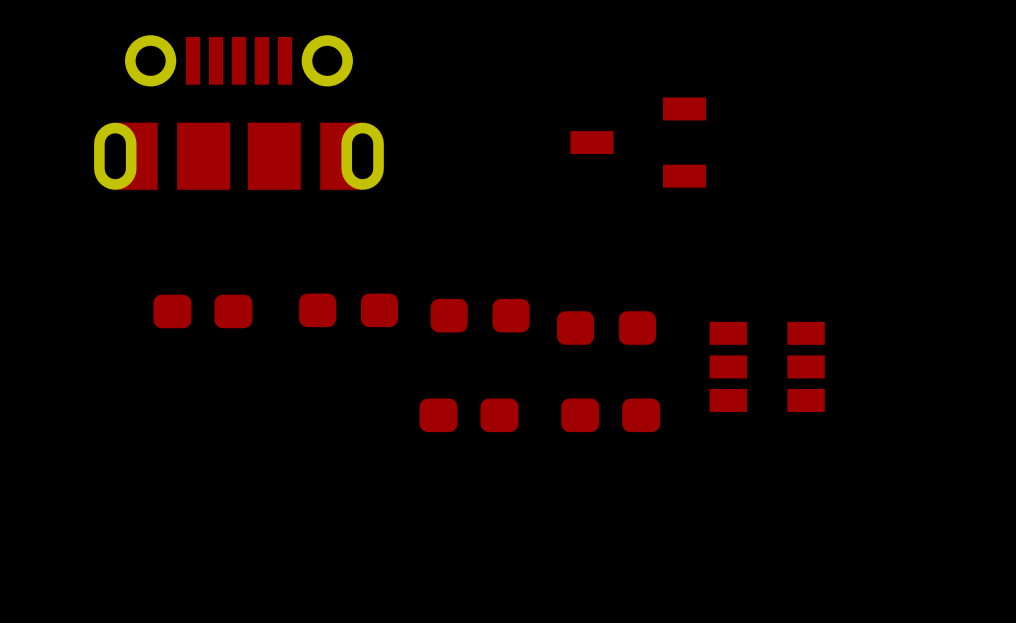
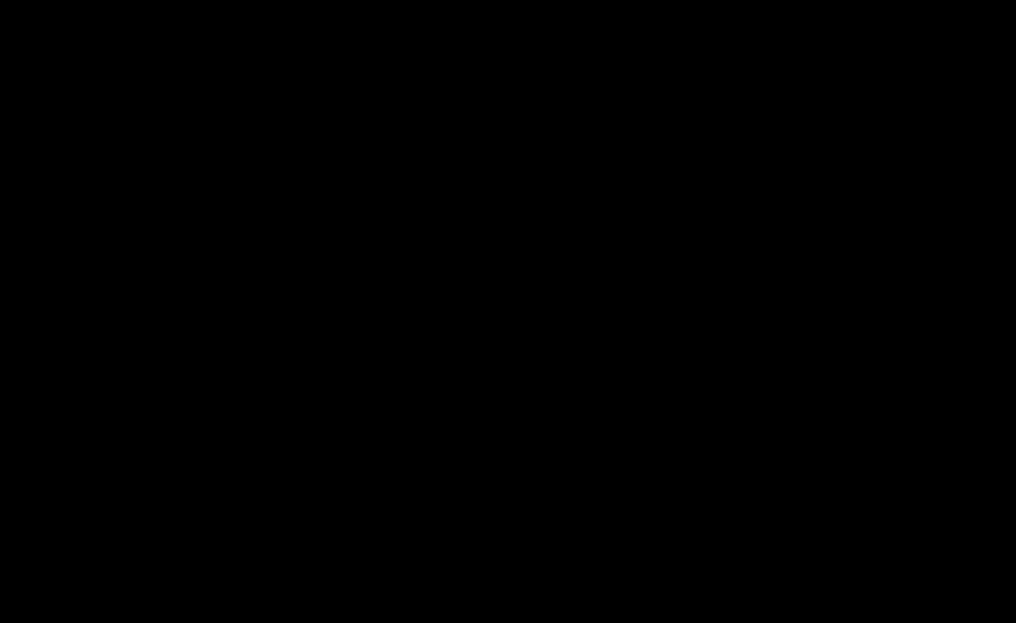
part: (238, 112) -> none
part: (638, 142) -> none
part: (348, 310) -> none
part: (202, 311) -> none
part: (480, 315) -> none
part: (606, 328) -> none
part: (767, 366) -> none
part: (468, 415) -> none
part: (610, 415) -> none

